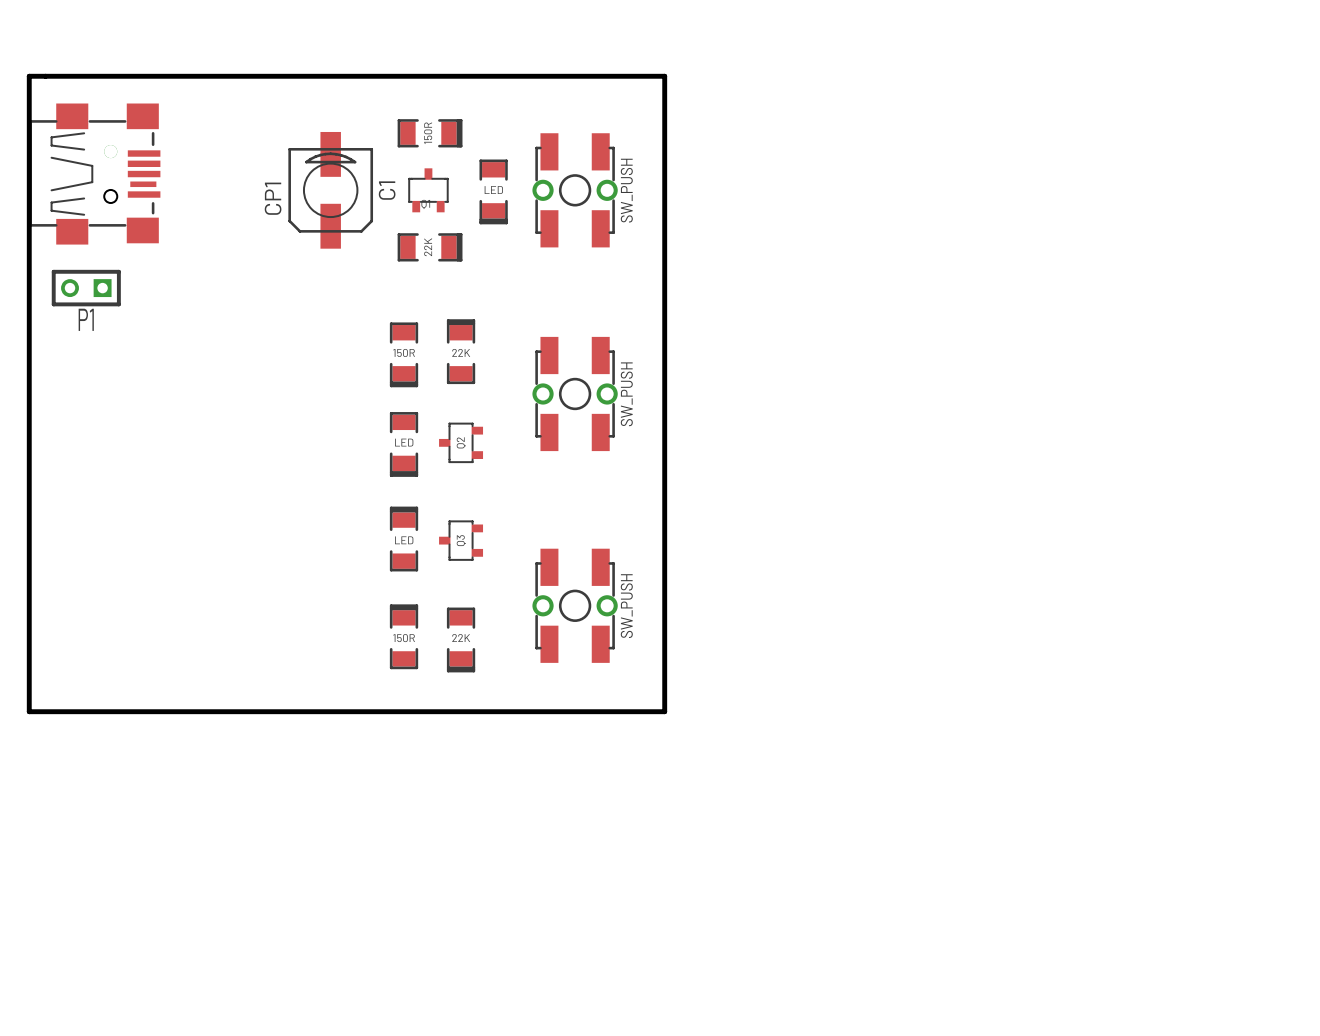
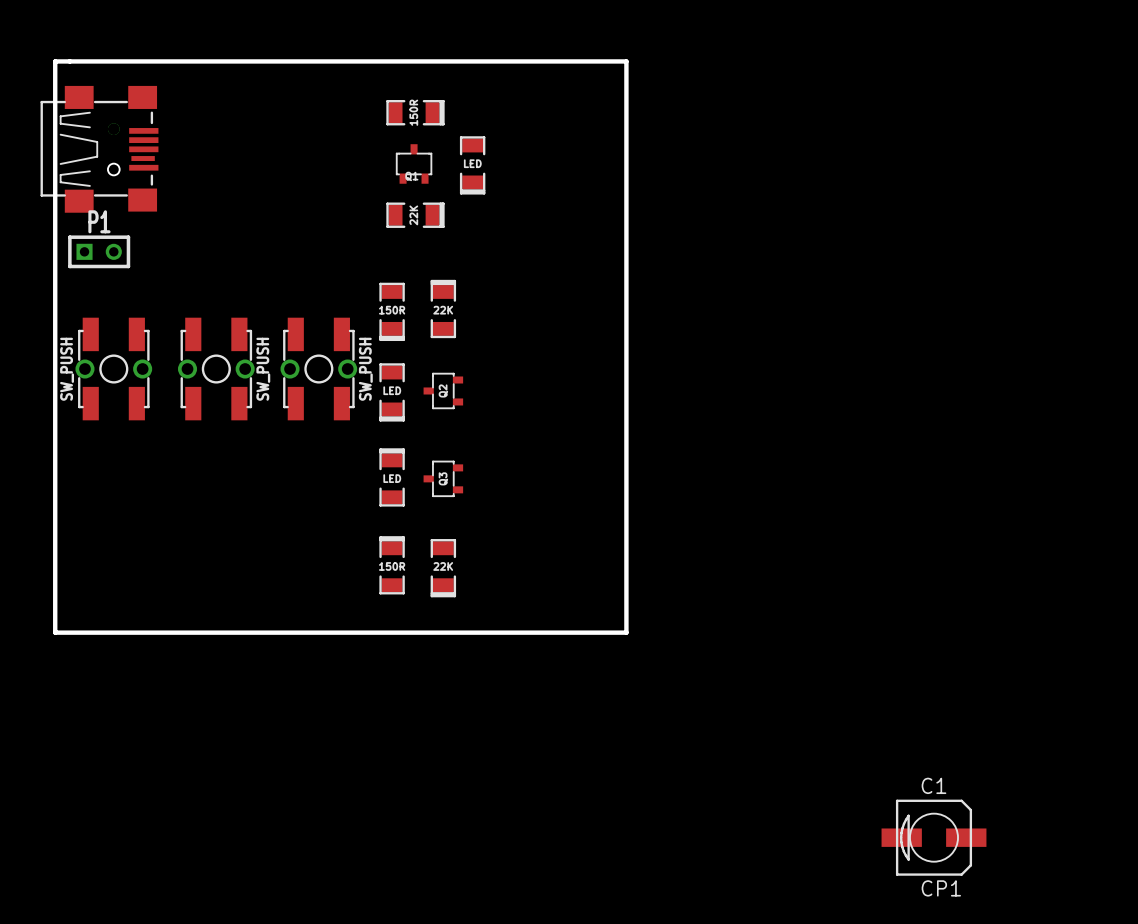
part position: (94, 174) -> (99, 149)
C1 rotation: 0° (330, 190) -> 90° counterclockwise (933, 837)
C1 position: (330, 190) -> (933, 837)
part: SW_PUSH (575, 190) -> none
P1 rotation: 0° (86, 288) -> 180° (99, 251)
part: SW_PUSH (575, 393) -> none
part: none -> SW_PUSH (113, 369)
part: none -> SW_PUSH (216, 369)
part: none -> SW_PUSH (318, 369)
part: SW_PUSH (575, 605) -> none

